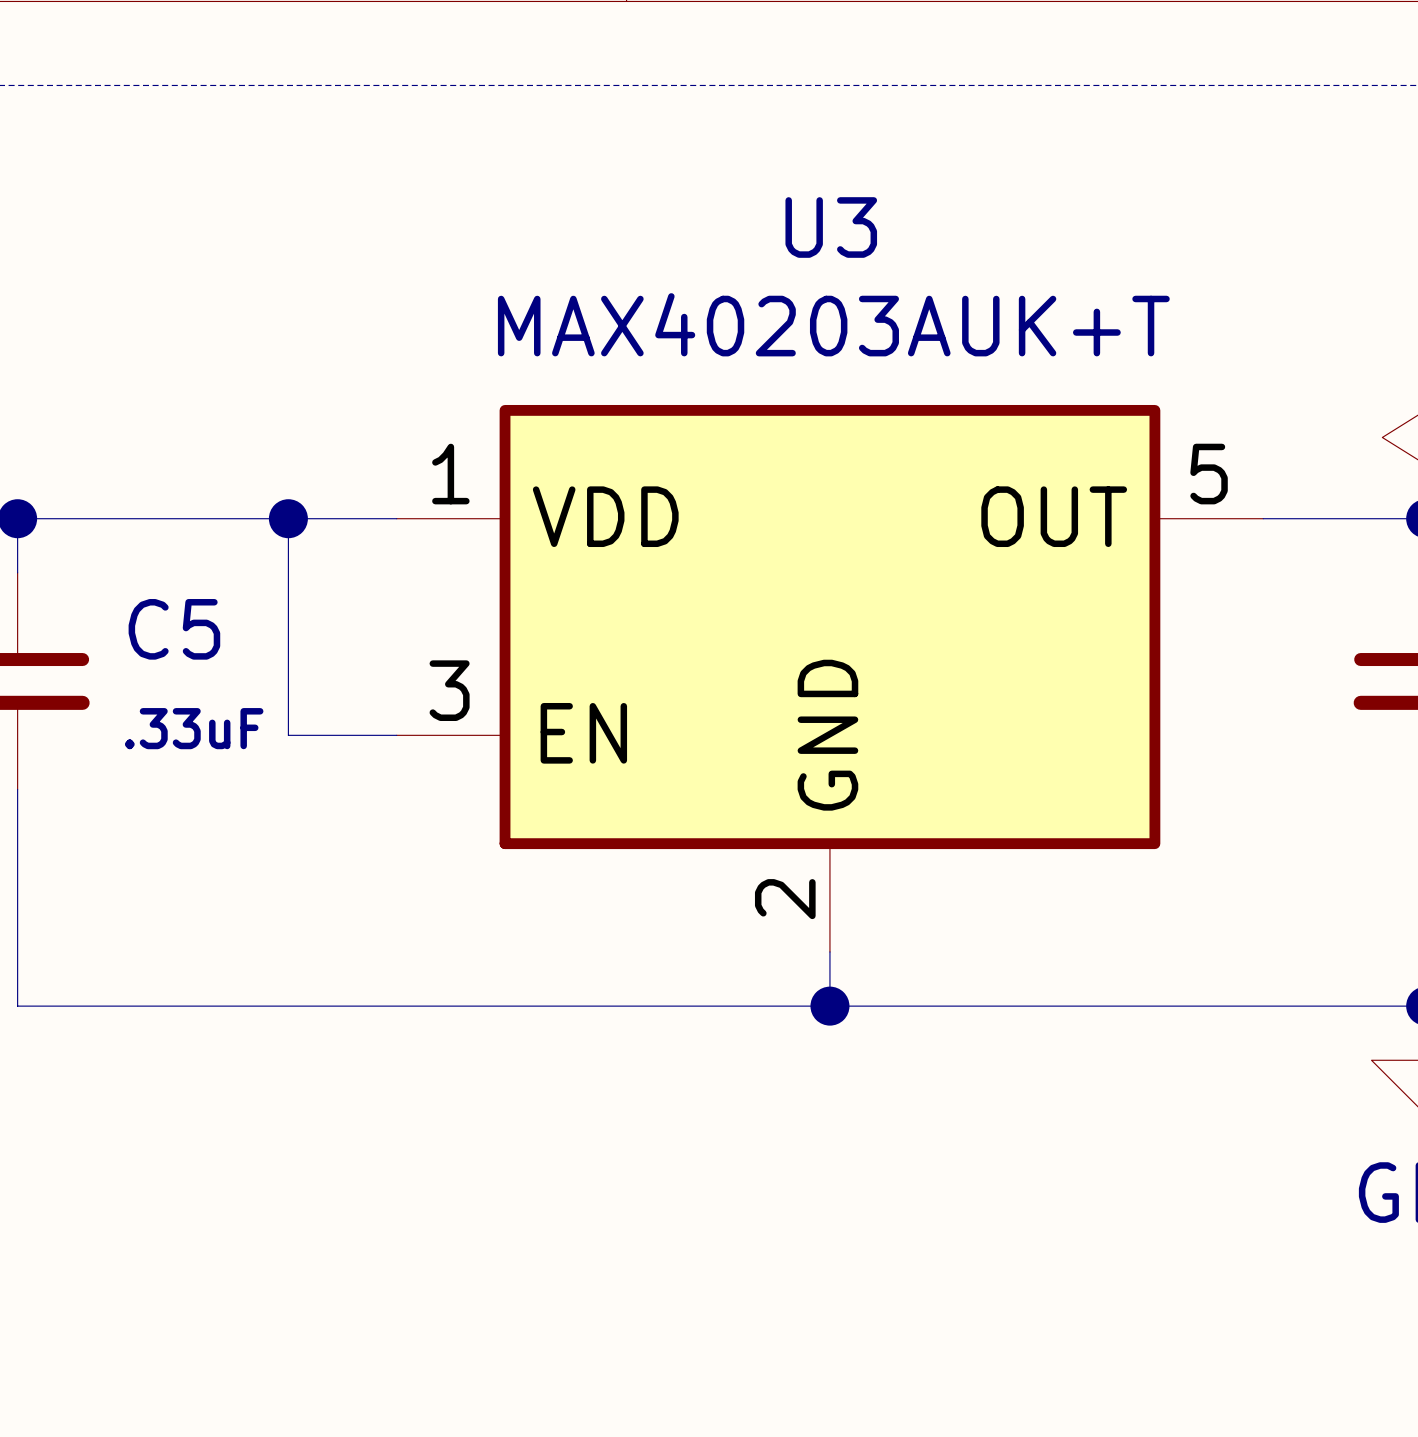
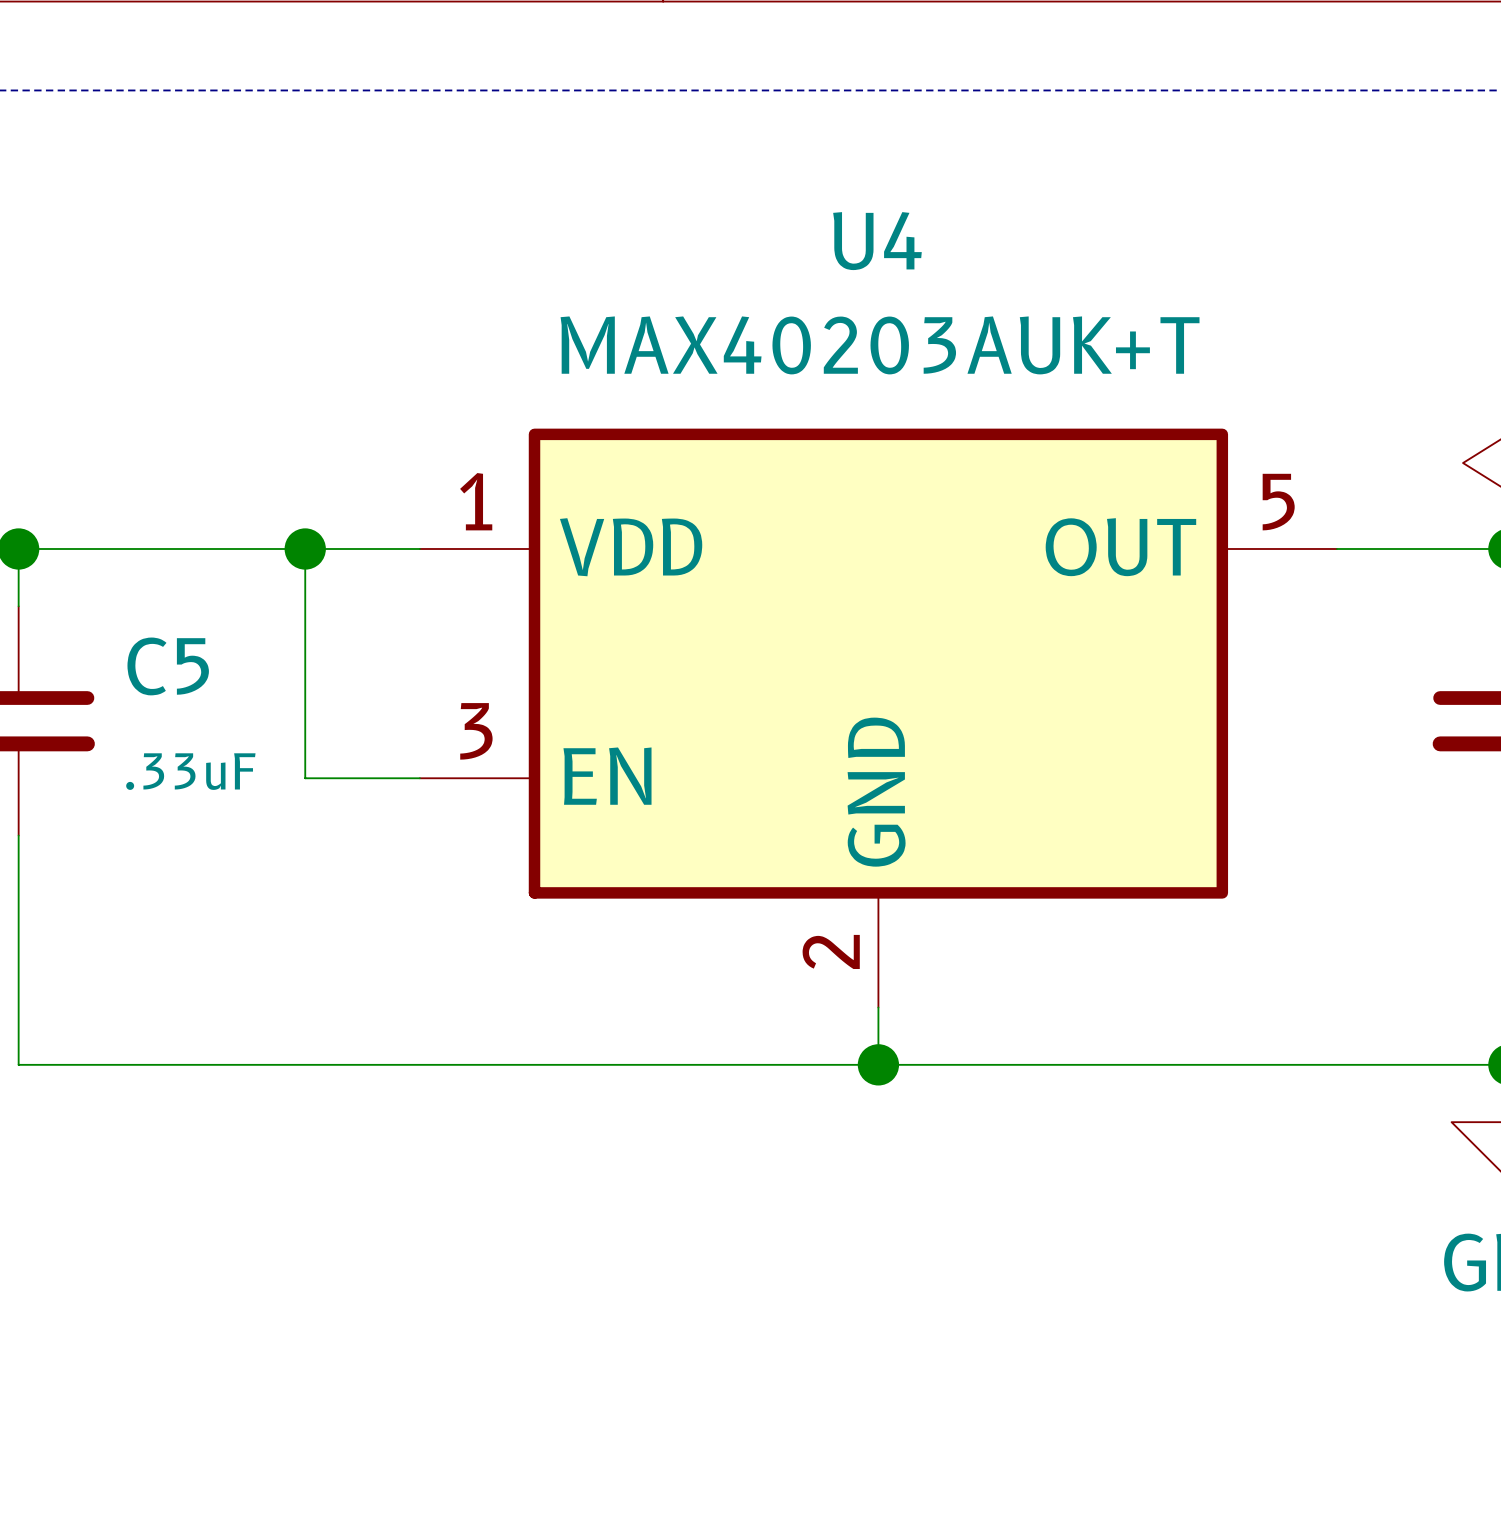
U3 name: U3 (831, 227) -> U4 (877, 241)

